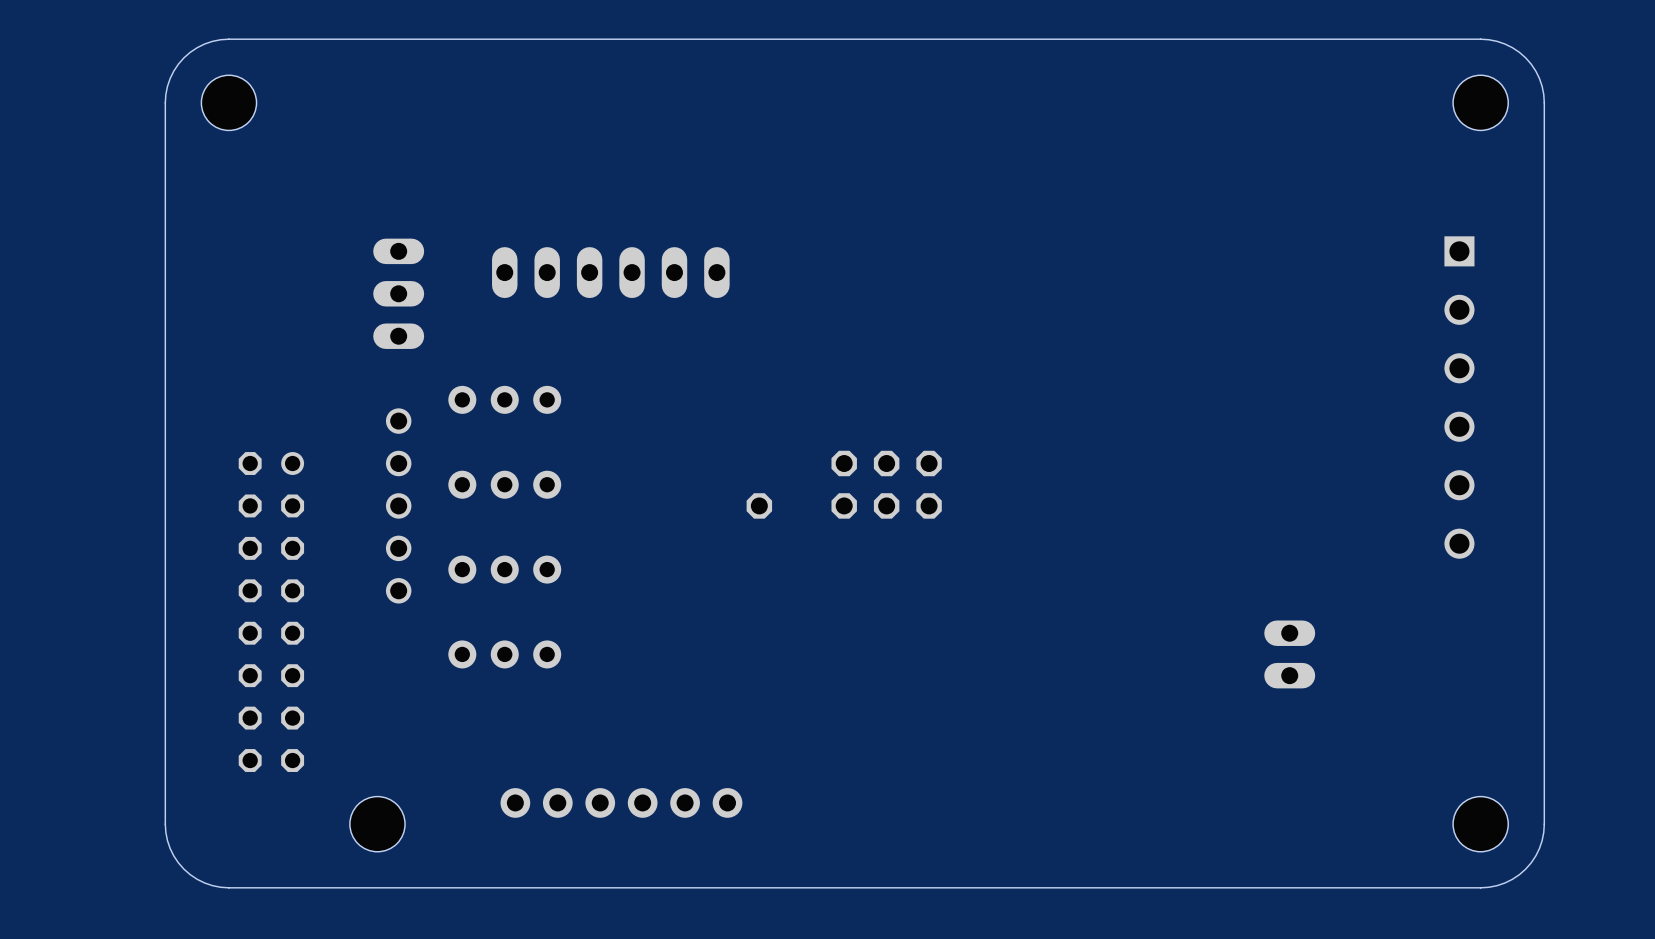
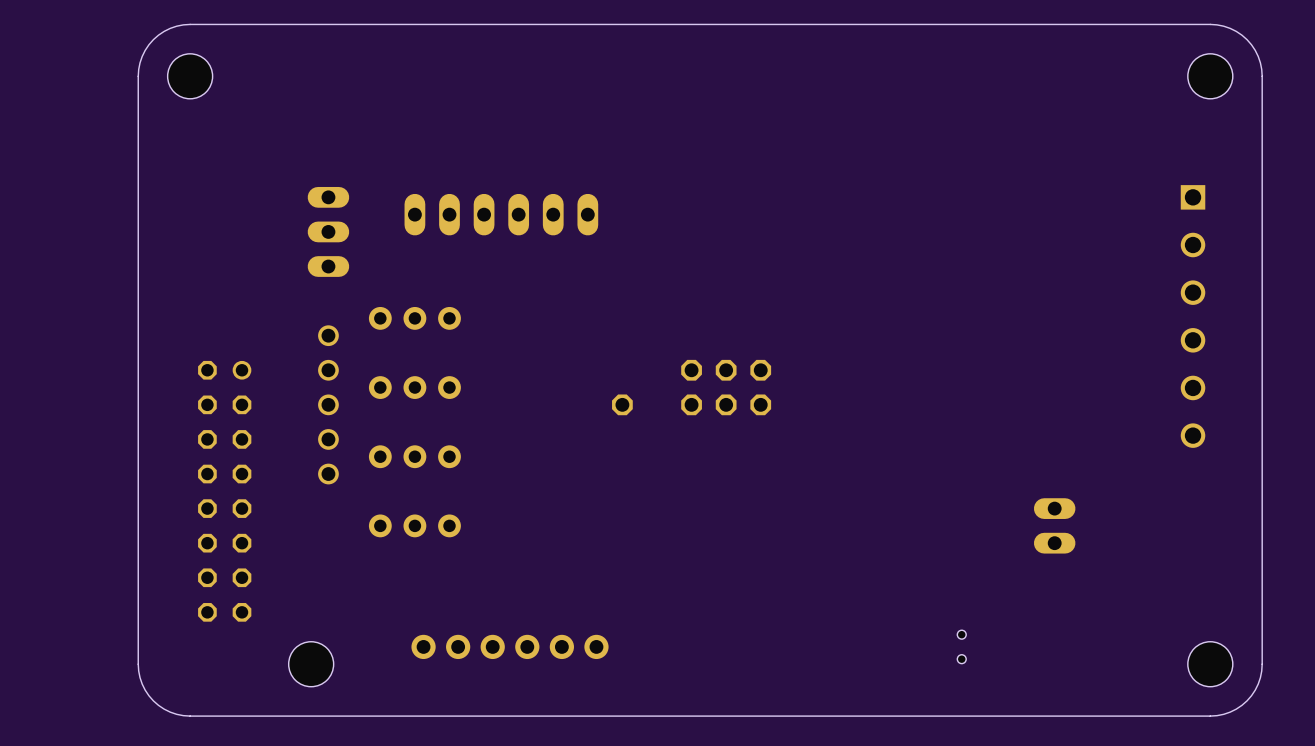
part: none -> (961, 646)

